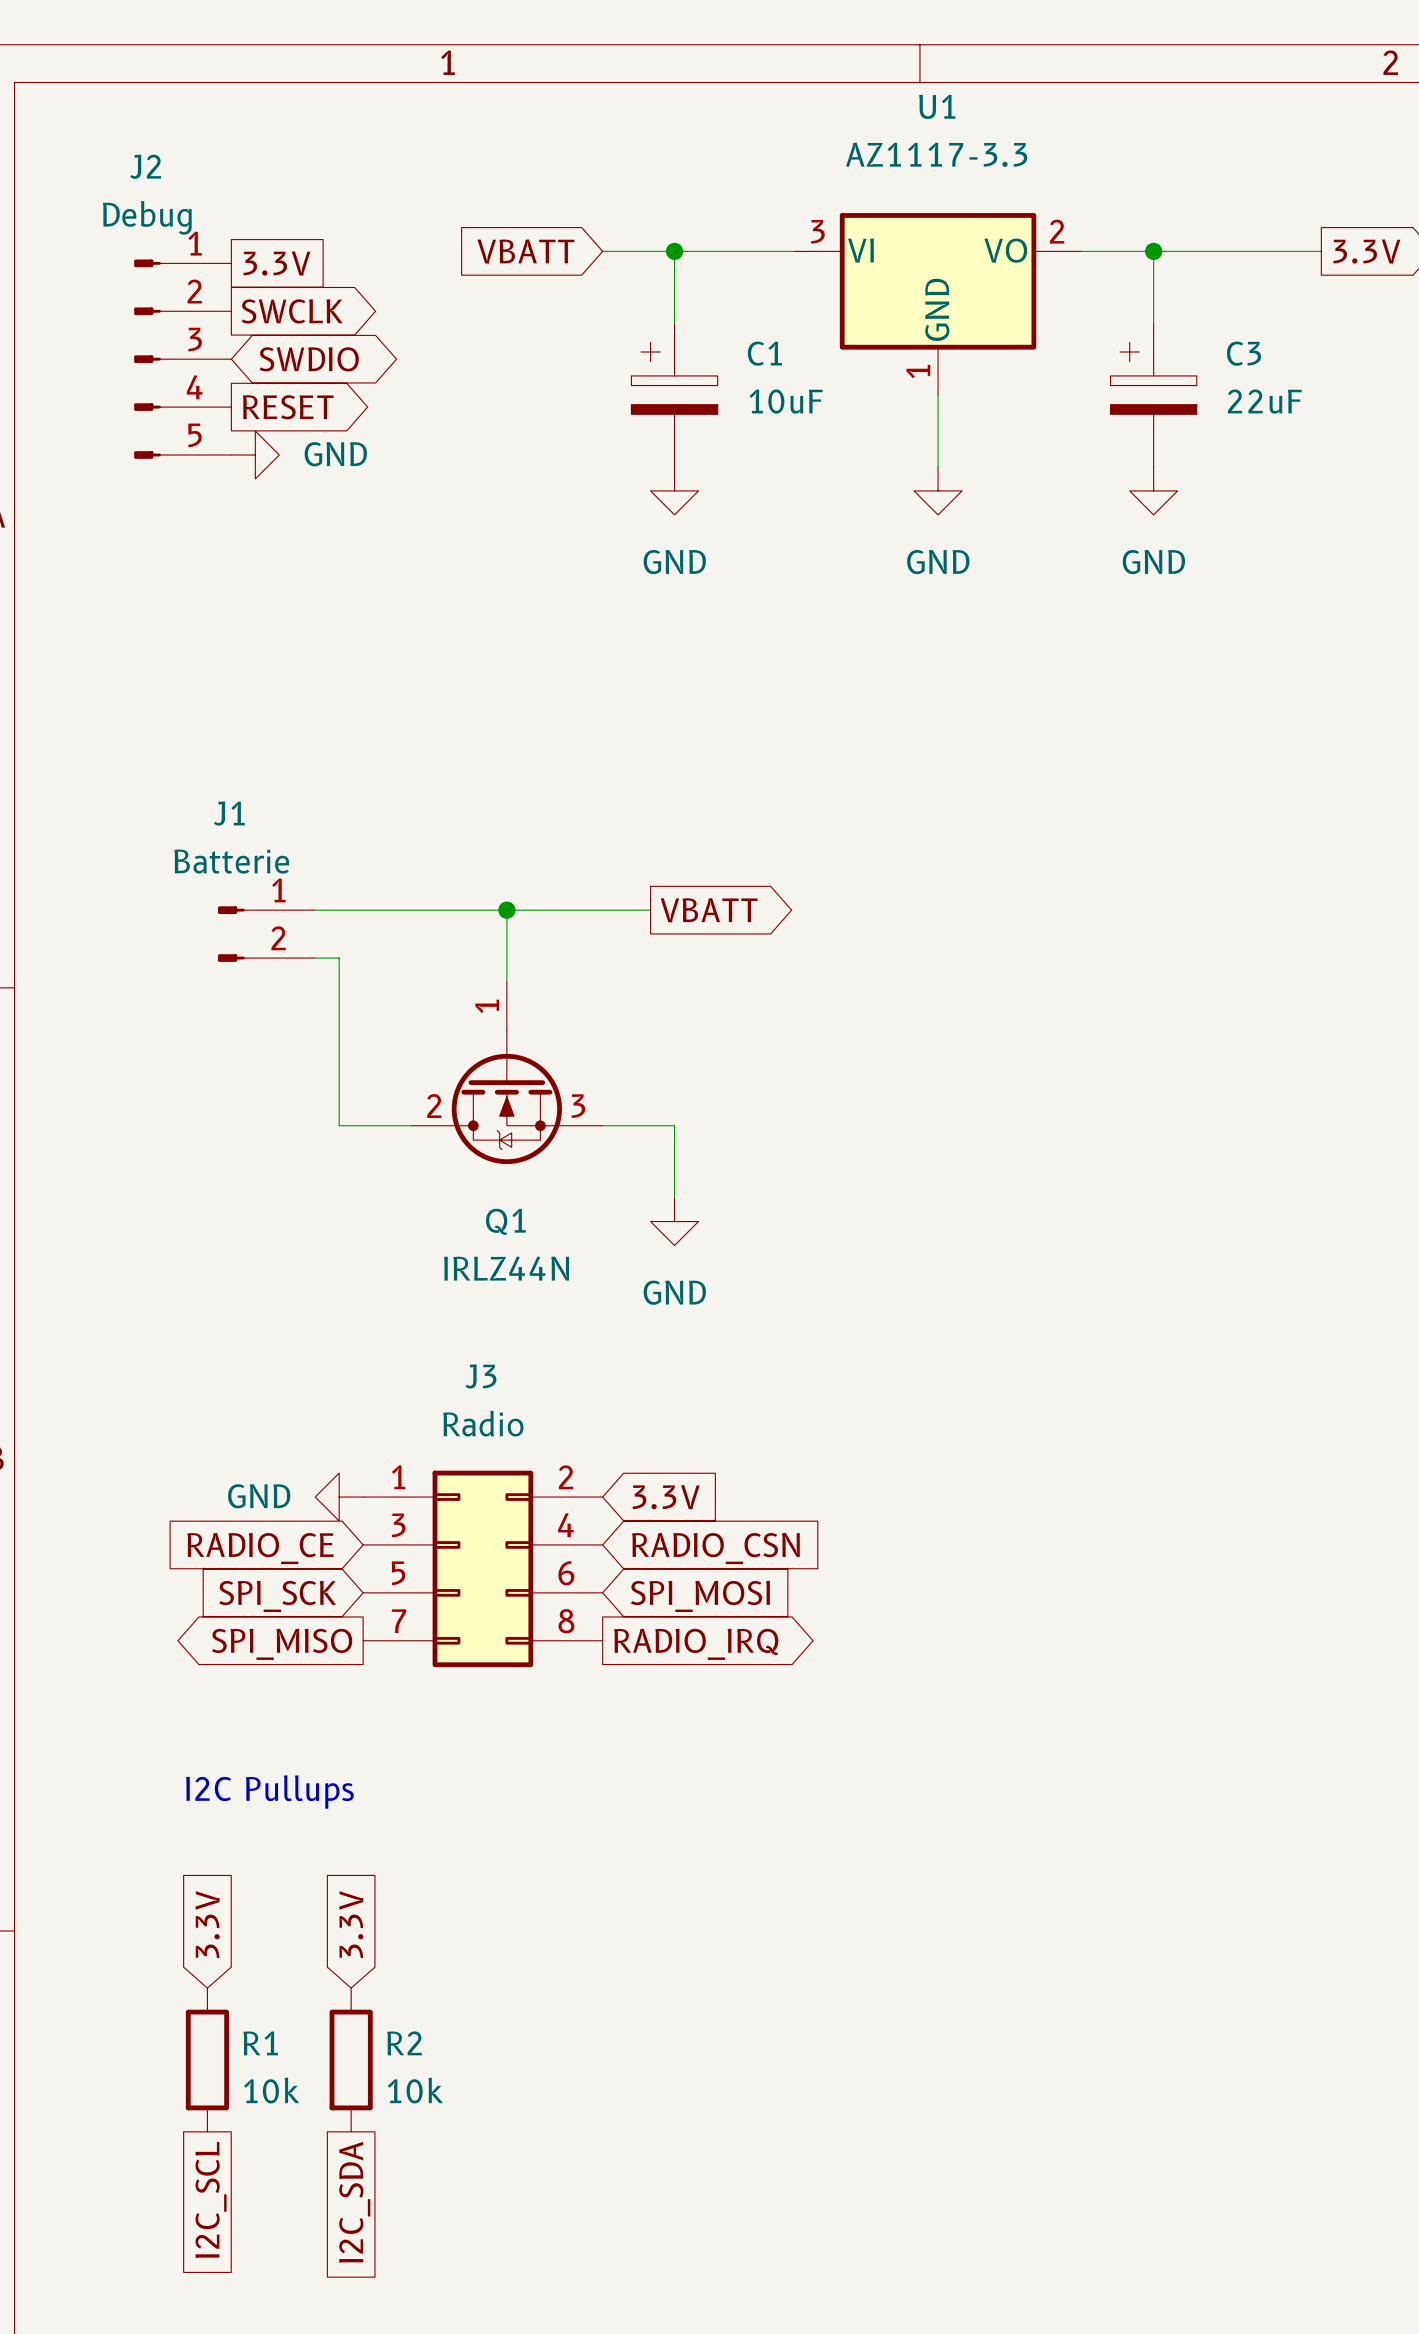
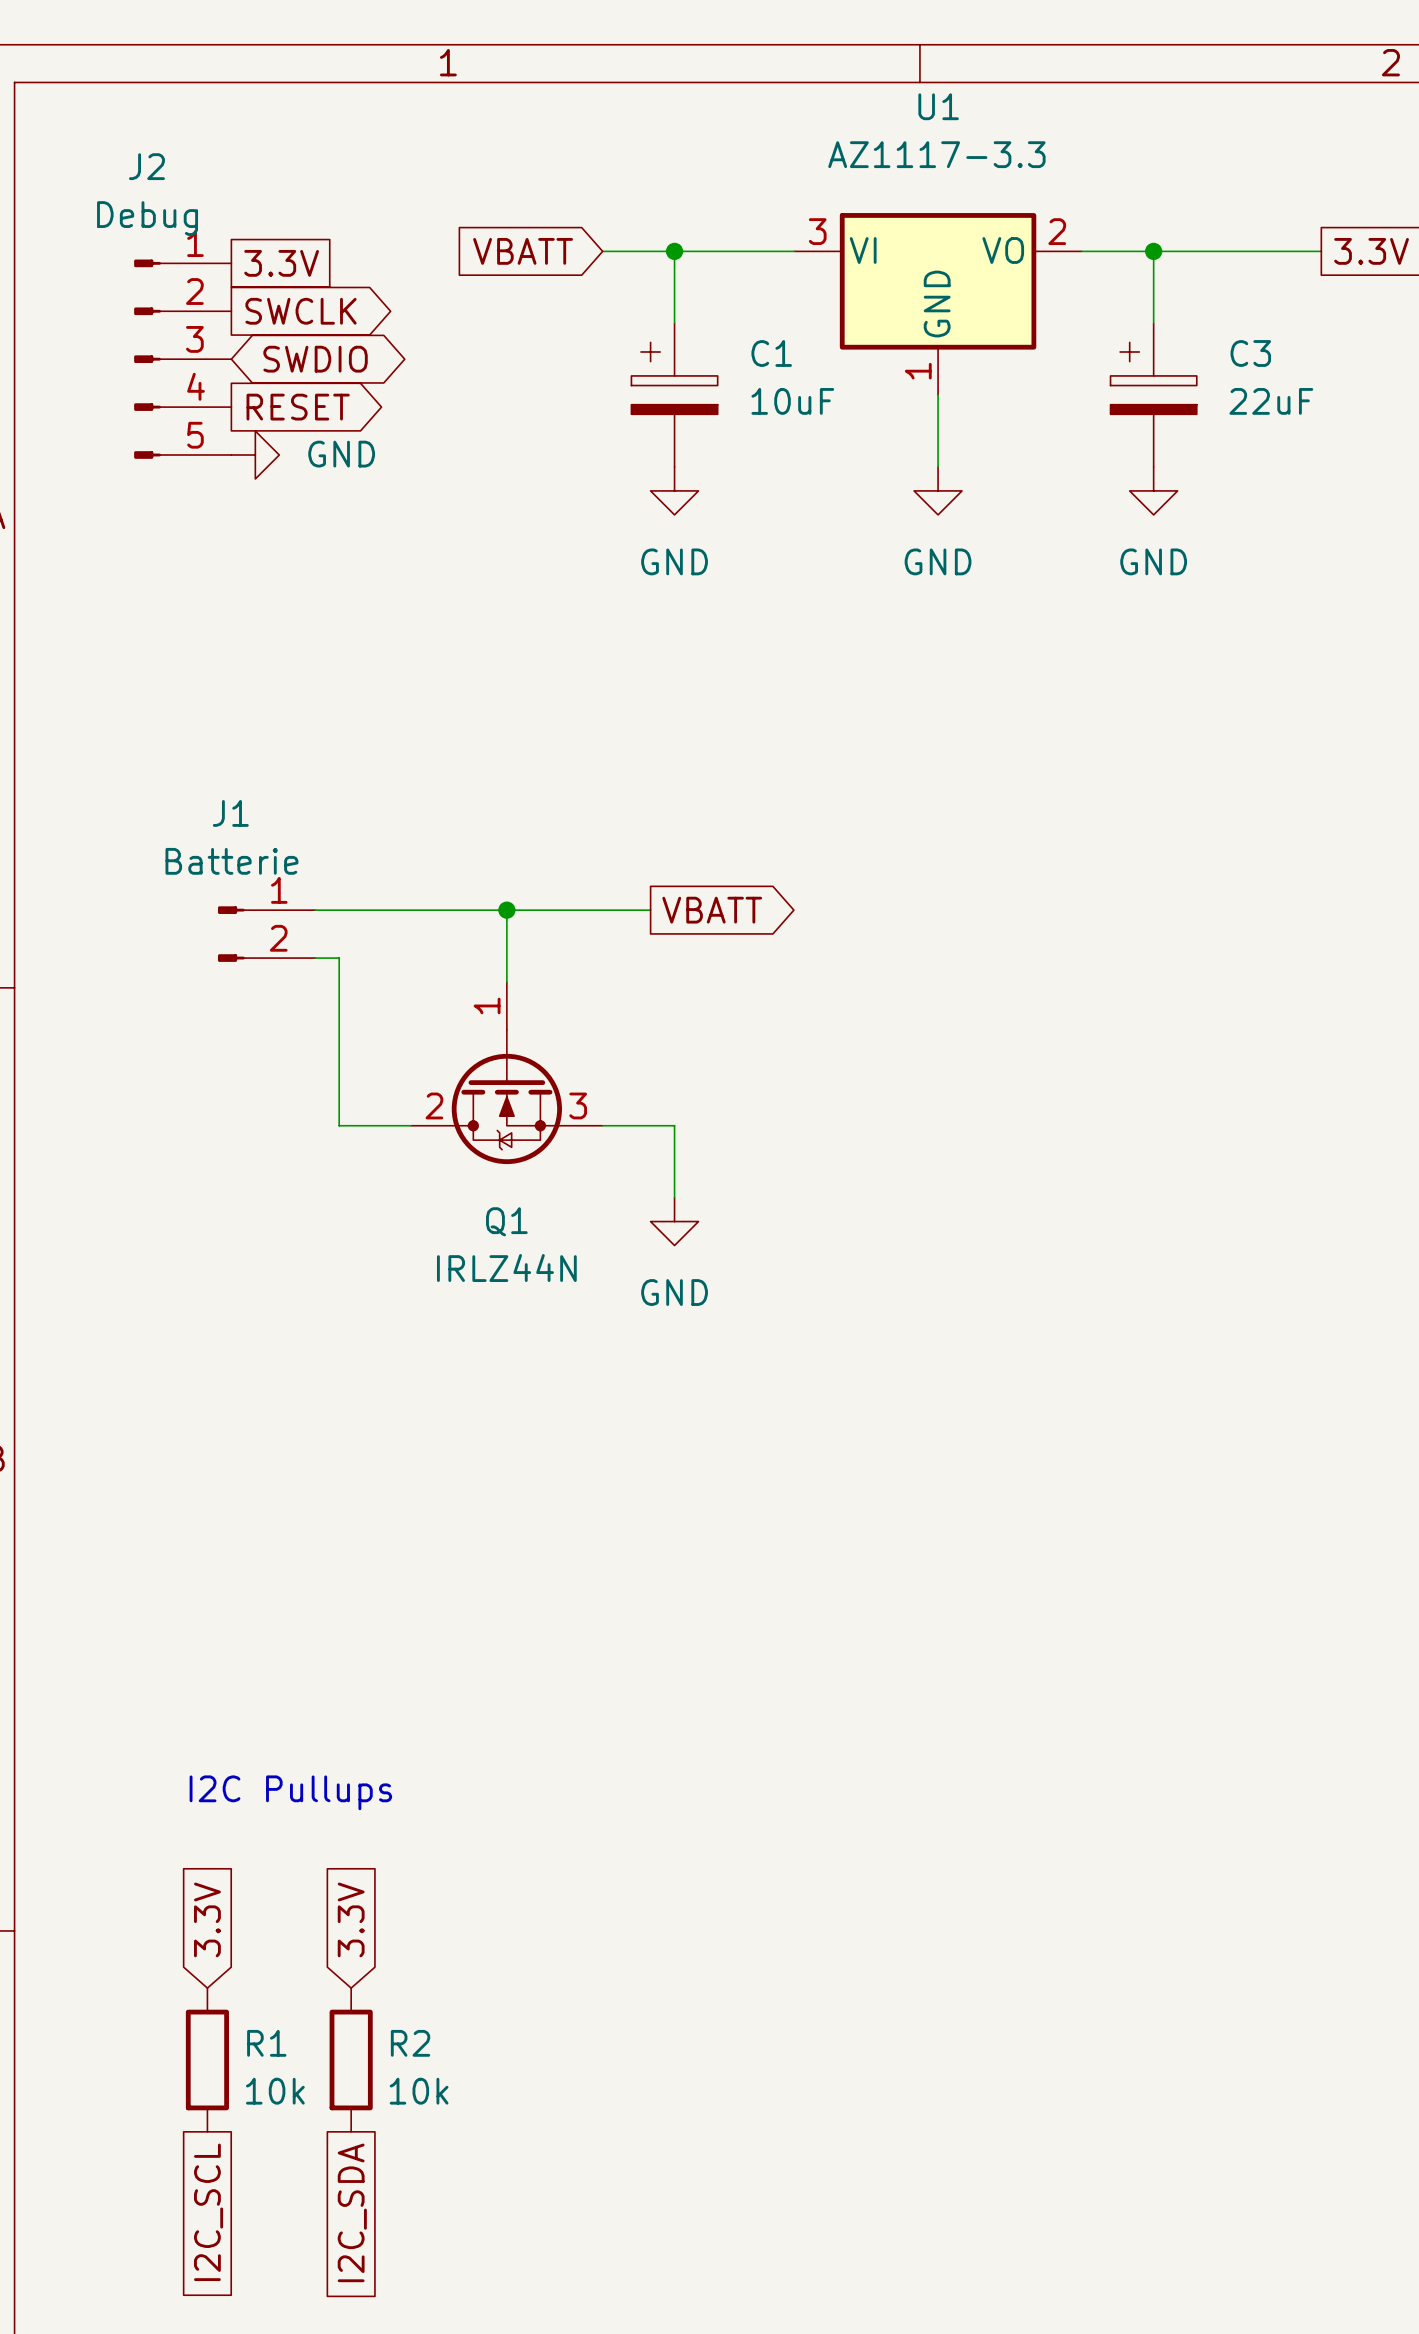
power symbol: GND (339, 1497) -> none
global label: 3.3V (666, 1497) -> none
global label: RADIO_CE (260, 1548) -> none
global label: RADIO_CSN (715, 1548) -> none
J3: Radio (482, 1568) -> none
global label: SPI_SCK (277, 1596) -> none
global label: SPI_MOSI (700, 1596) -> none
global label: SPI_MISO (282, 1644) -> none
global label: RADIO_IRQ (696, 1644) -> none

